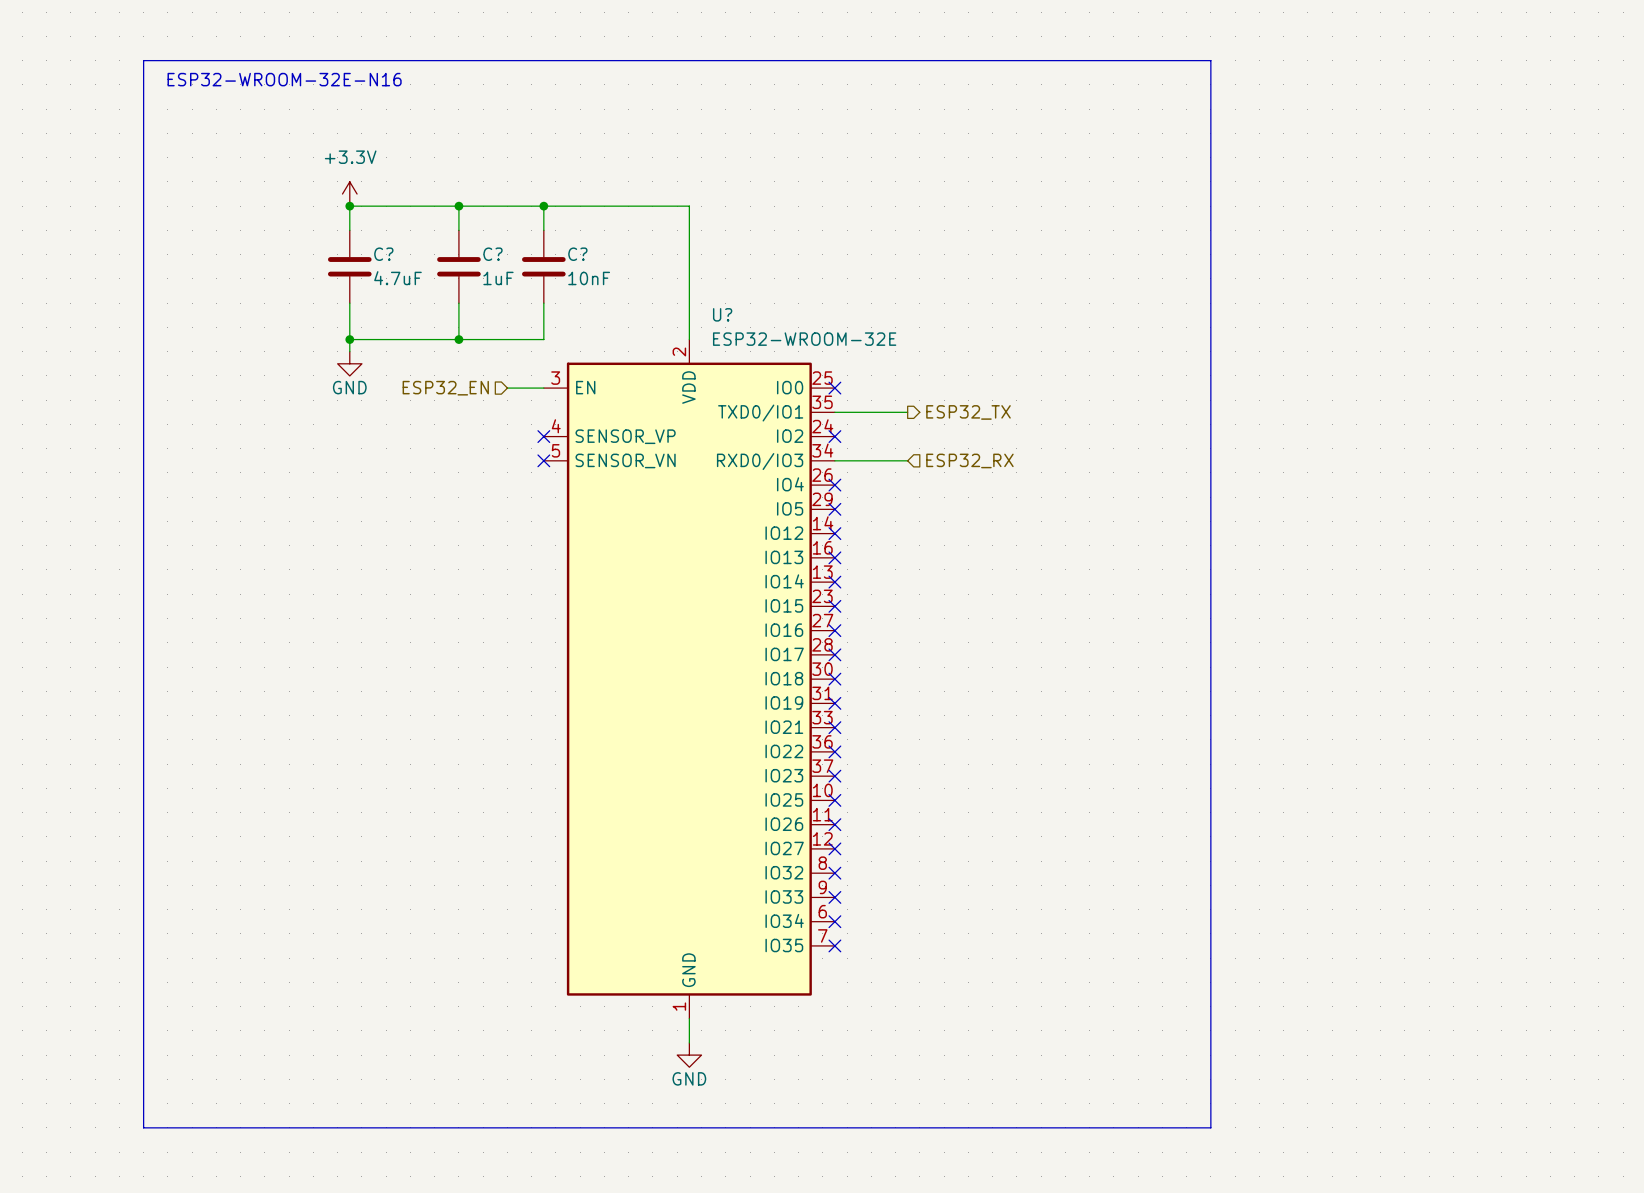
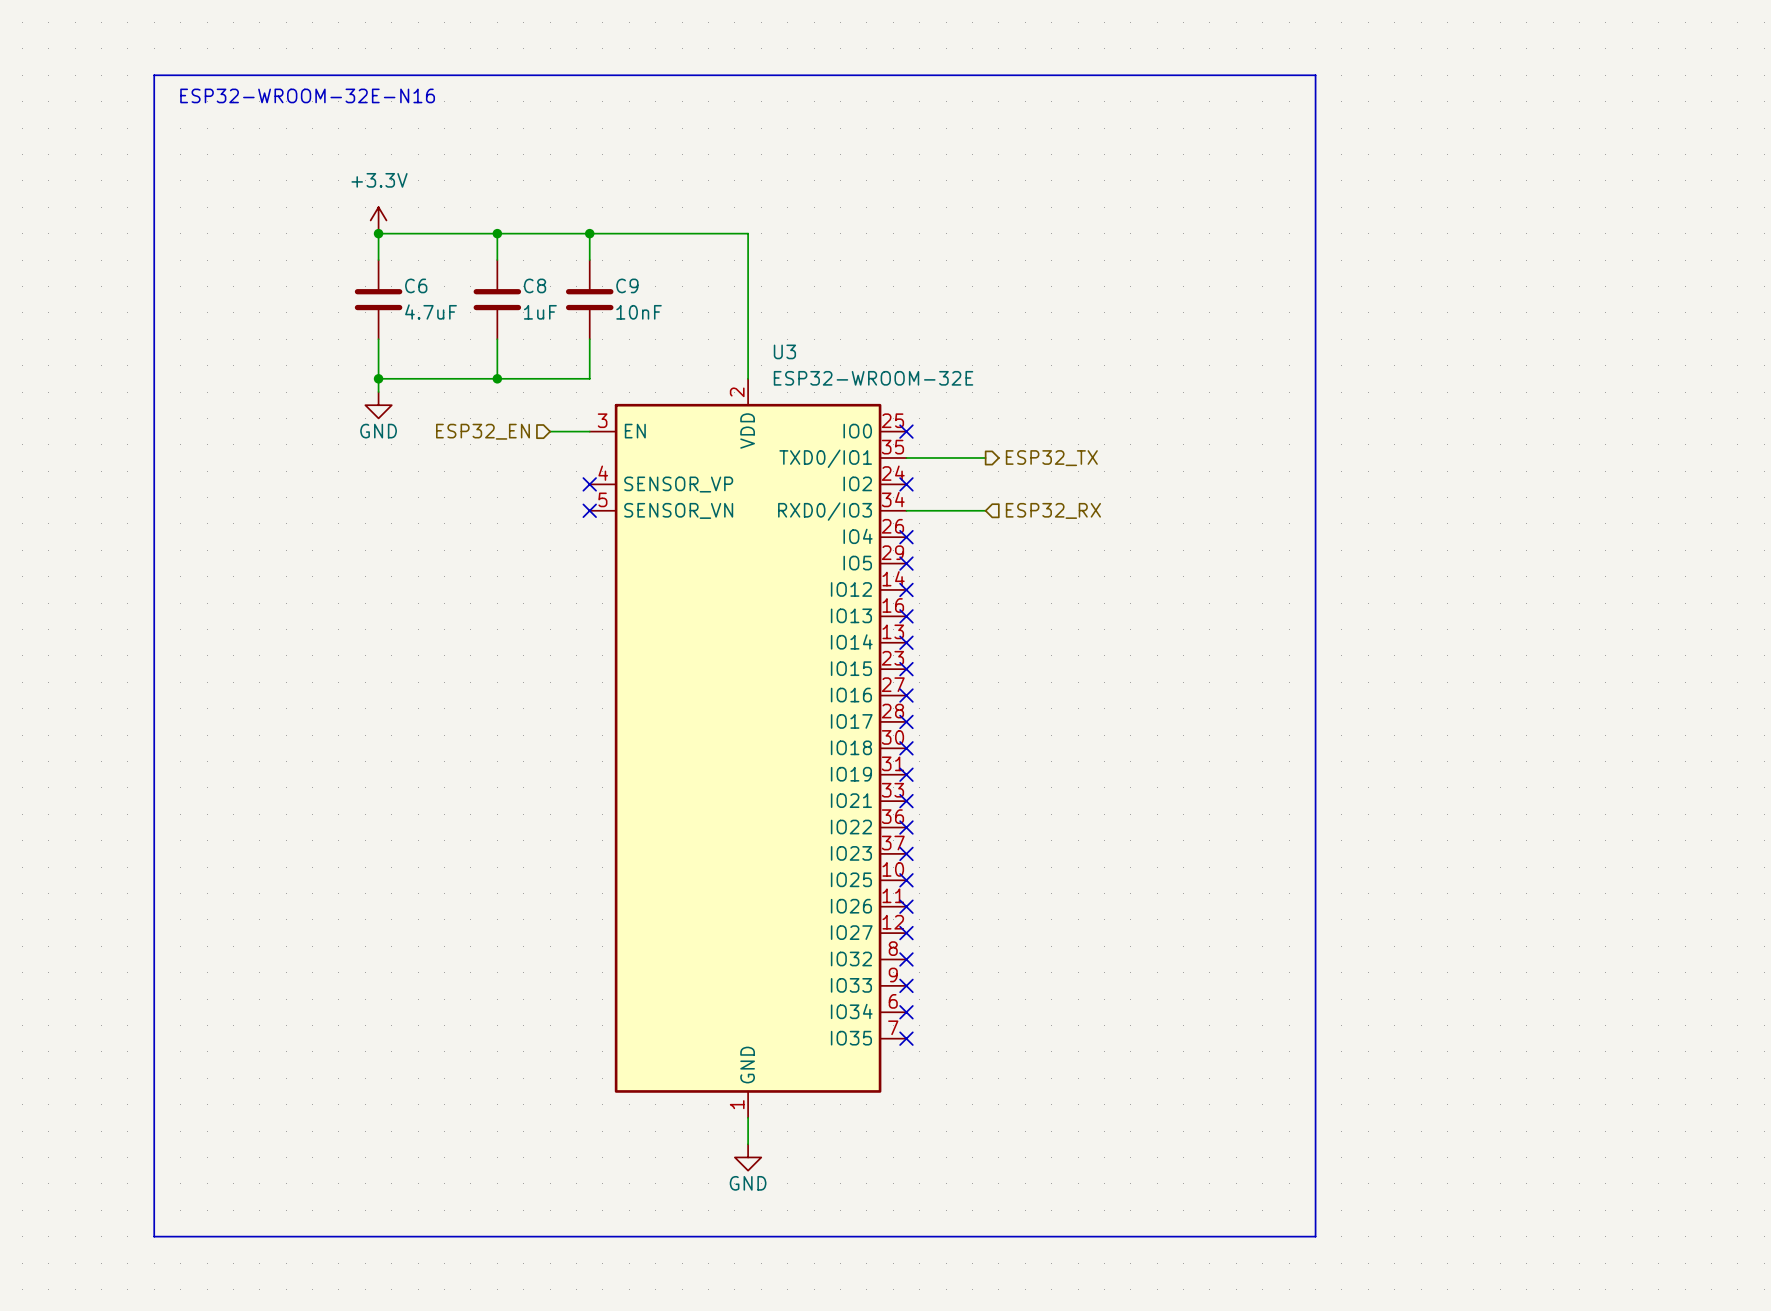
C? name: C? (383, 254) -> C6 (416, 285)
C? name: C? (492, 254) -> C8 (535, 285)
C? name: C? (577, 254) -> C9 (627, 285)
U? name: U? (722, 314) -> U3 (784, 351)

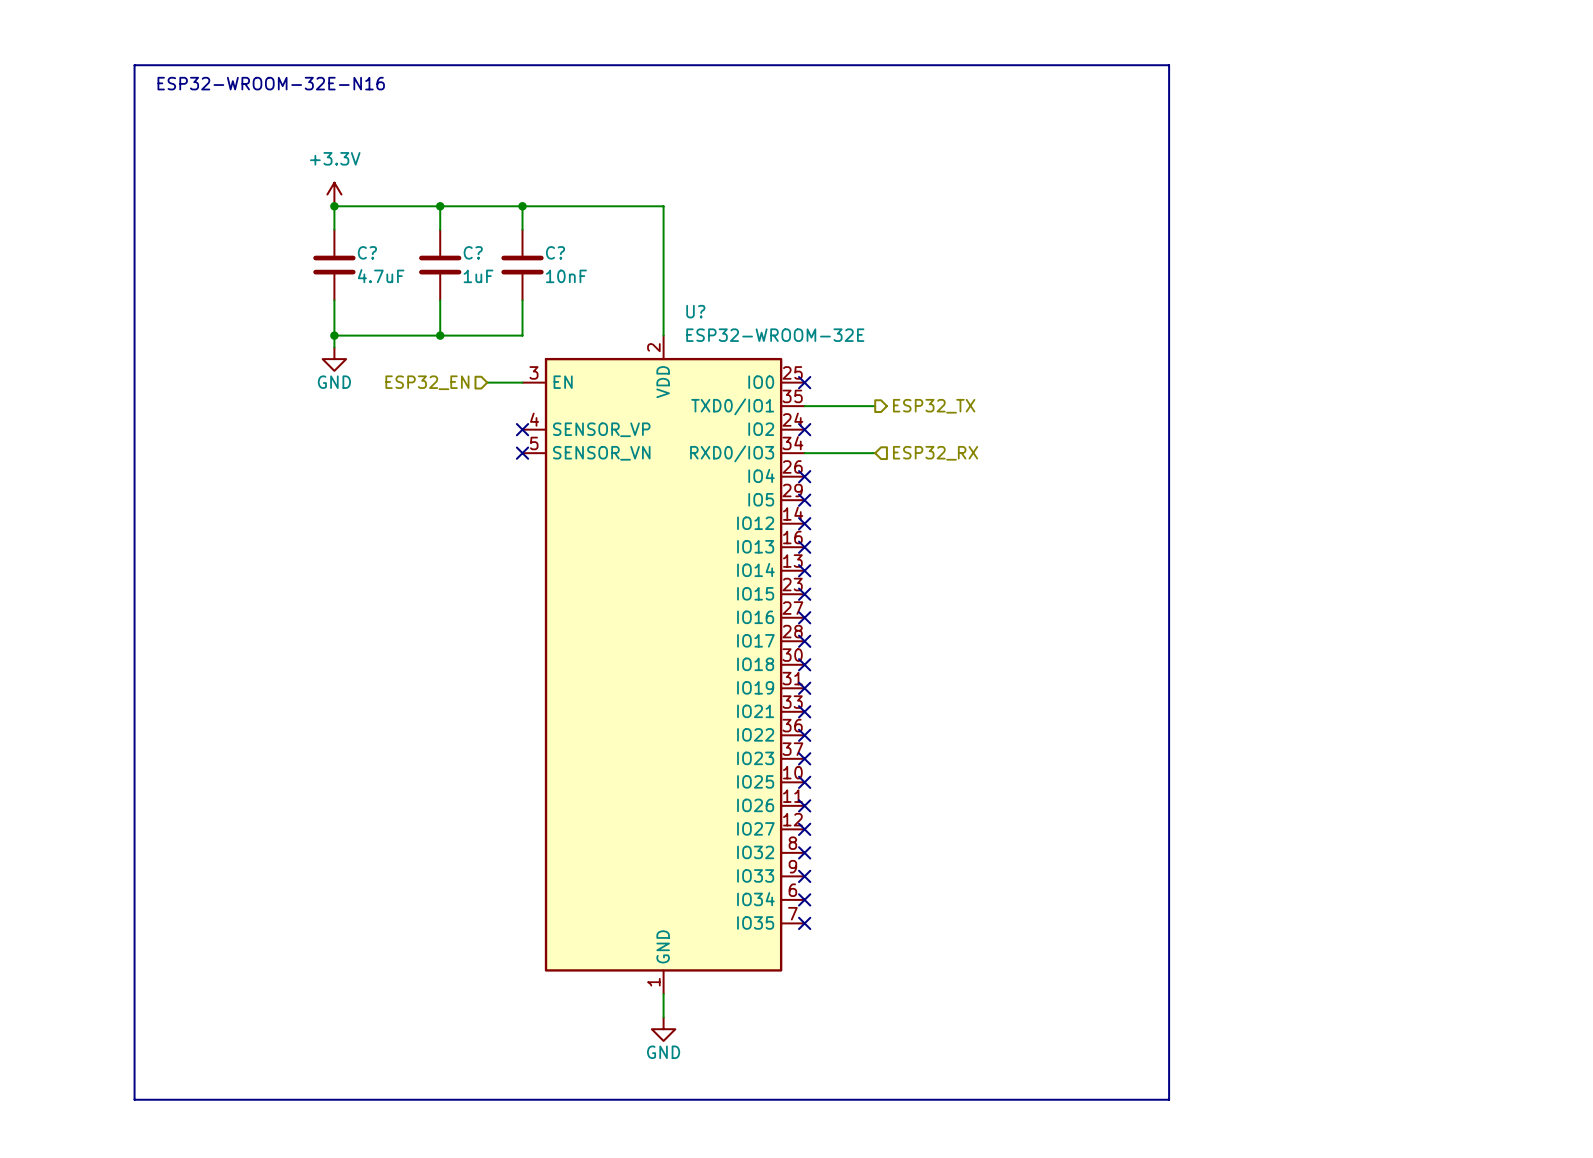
C6 name: C6 (416, 285) -> C? (367, 252)
C8 name: C8 (535, 285) -> C? (473, 252)
C9 name: C9 (627, 285) -> C? (555, 252)
U3 name: U3 (784, 351) -> U? (695, 311)

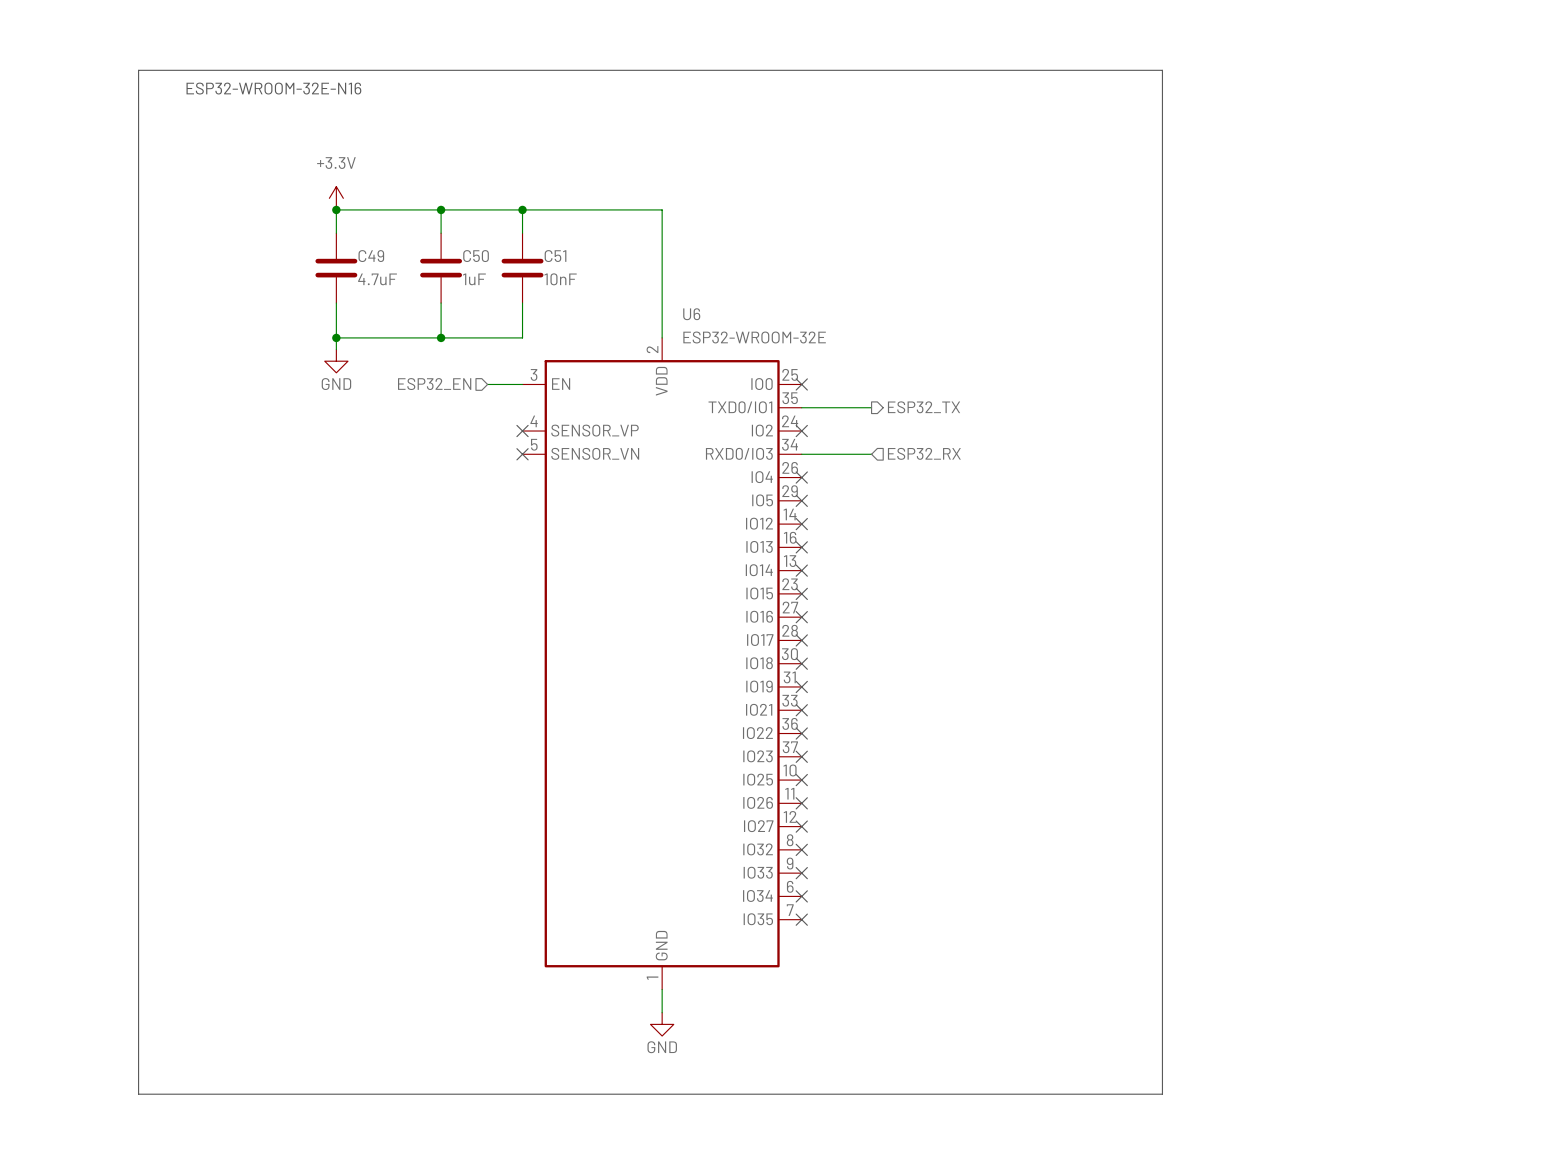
C? name: C? (367, 252) -> C49 (371, 256)
C? name: C? (473, 252) -> C50 (476, 256)
C? name: C? (555, 252) -> C51 (555, 256)
U? name: U? (695, 311) -> U6 (691, 314)

